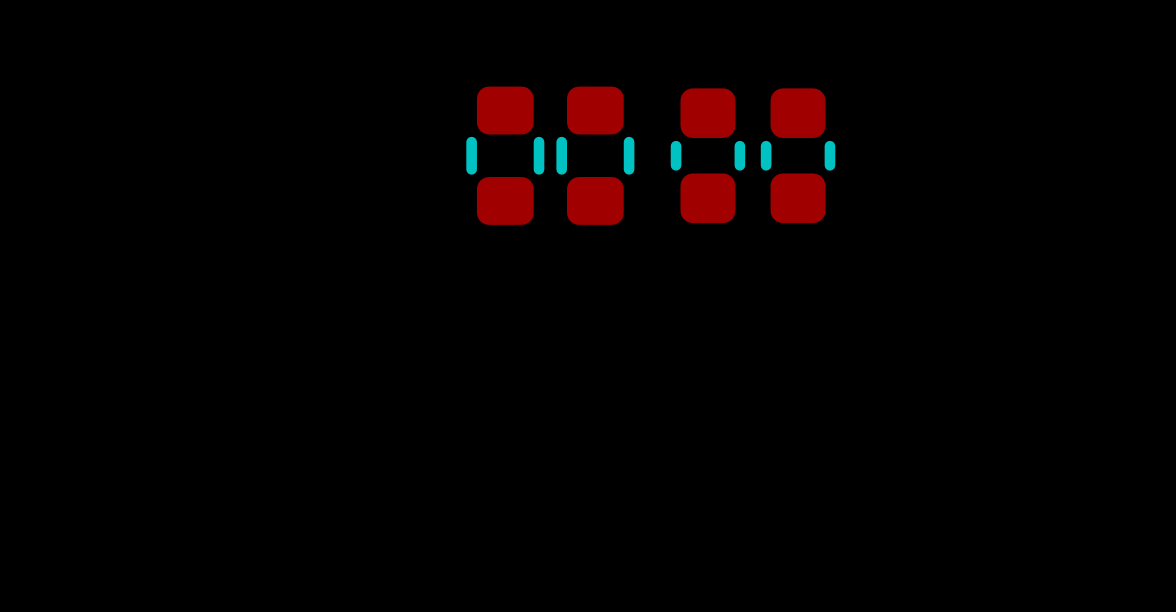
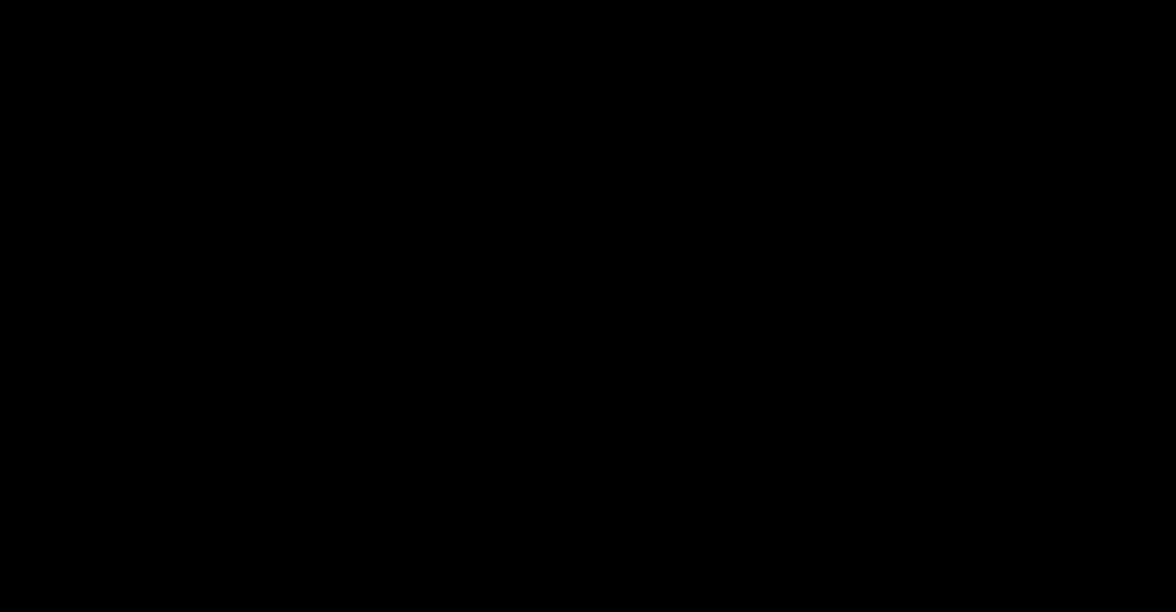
part: (505, 155) -> none
part: (595, 155) -> none
part: (707, 155) -> none
part: (798, 155) -> none

